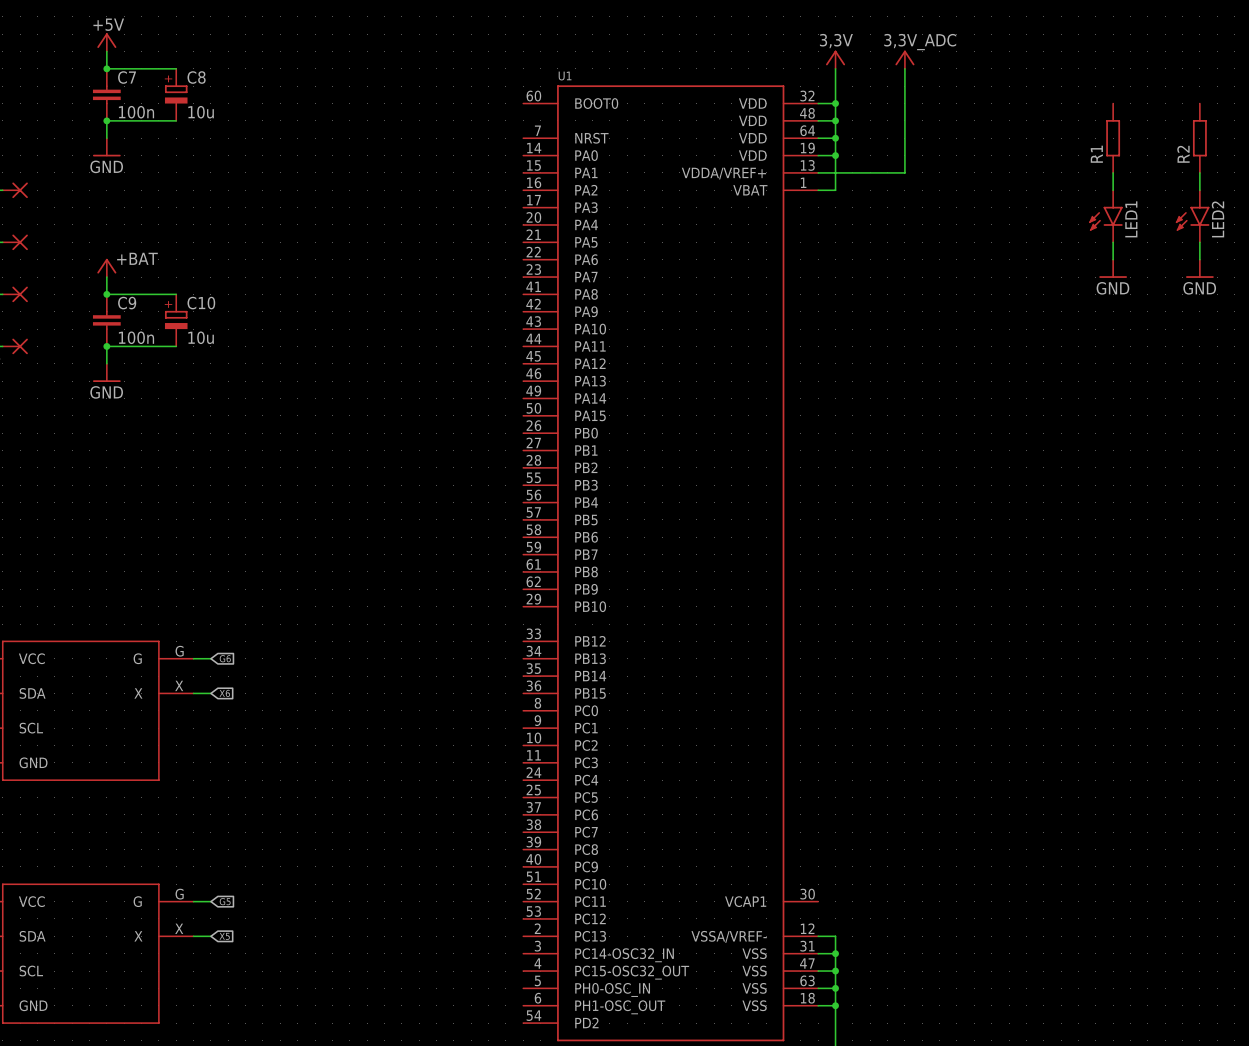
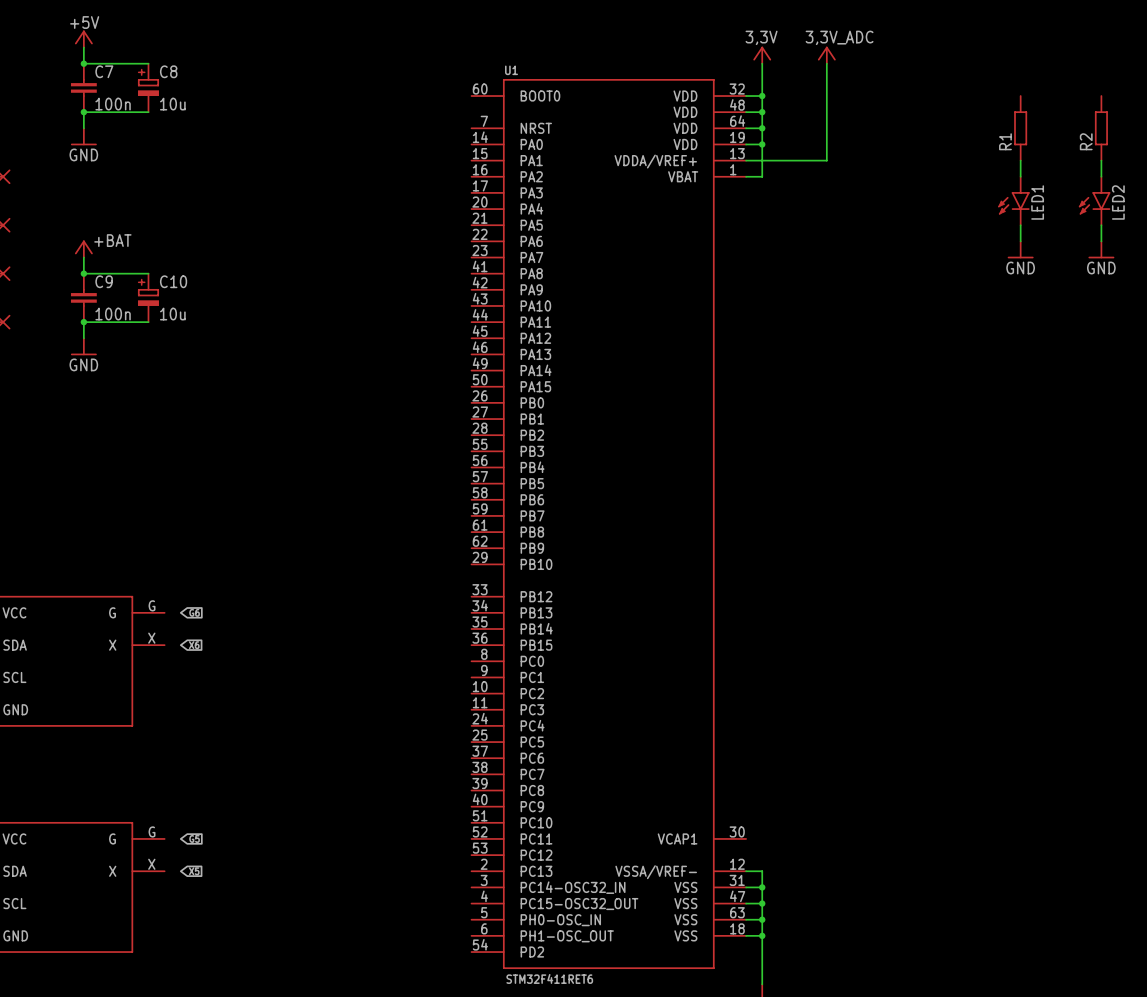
wire: (193, 658) (210, 658) -> none
wire: (193, 693) (210, 693) -> none
wire: (193, 901) (210, 901) -> none
wire: (193, 936) (210, 936) -> none

